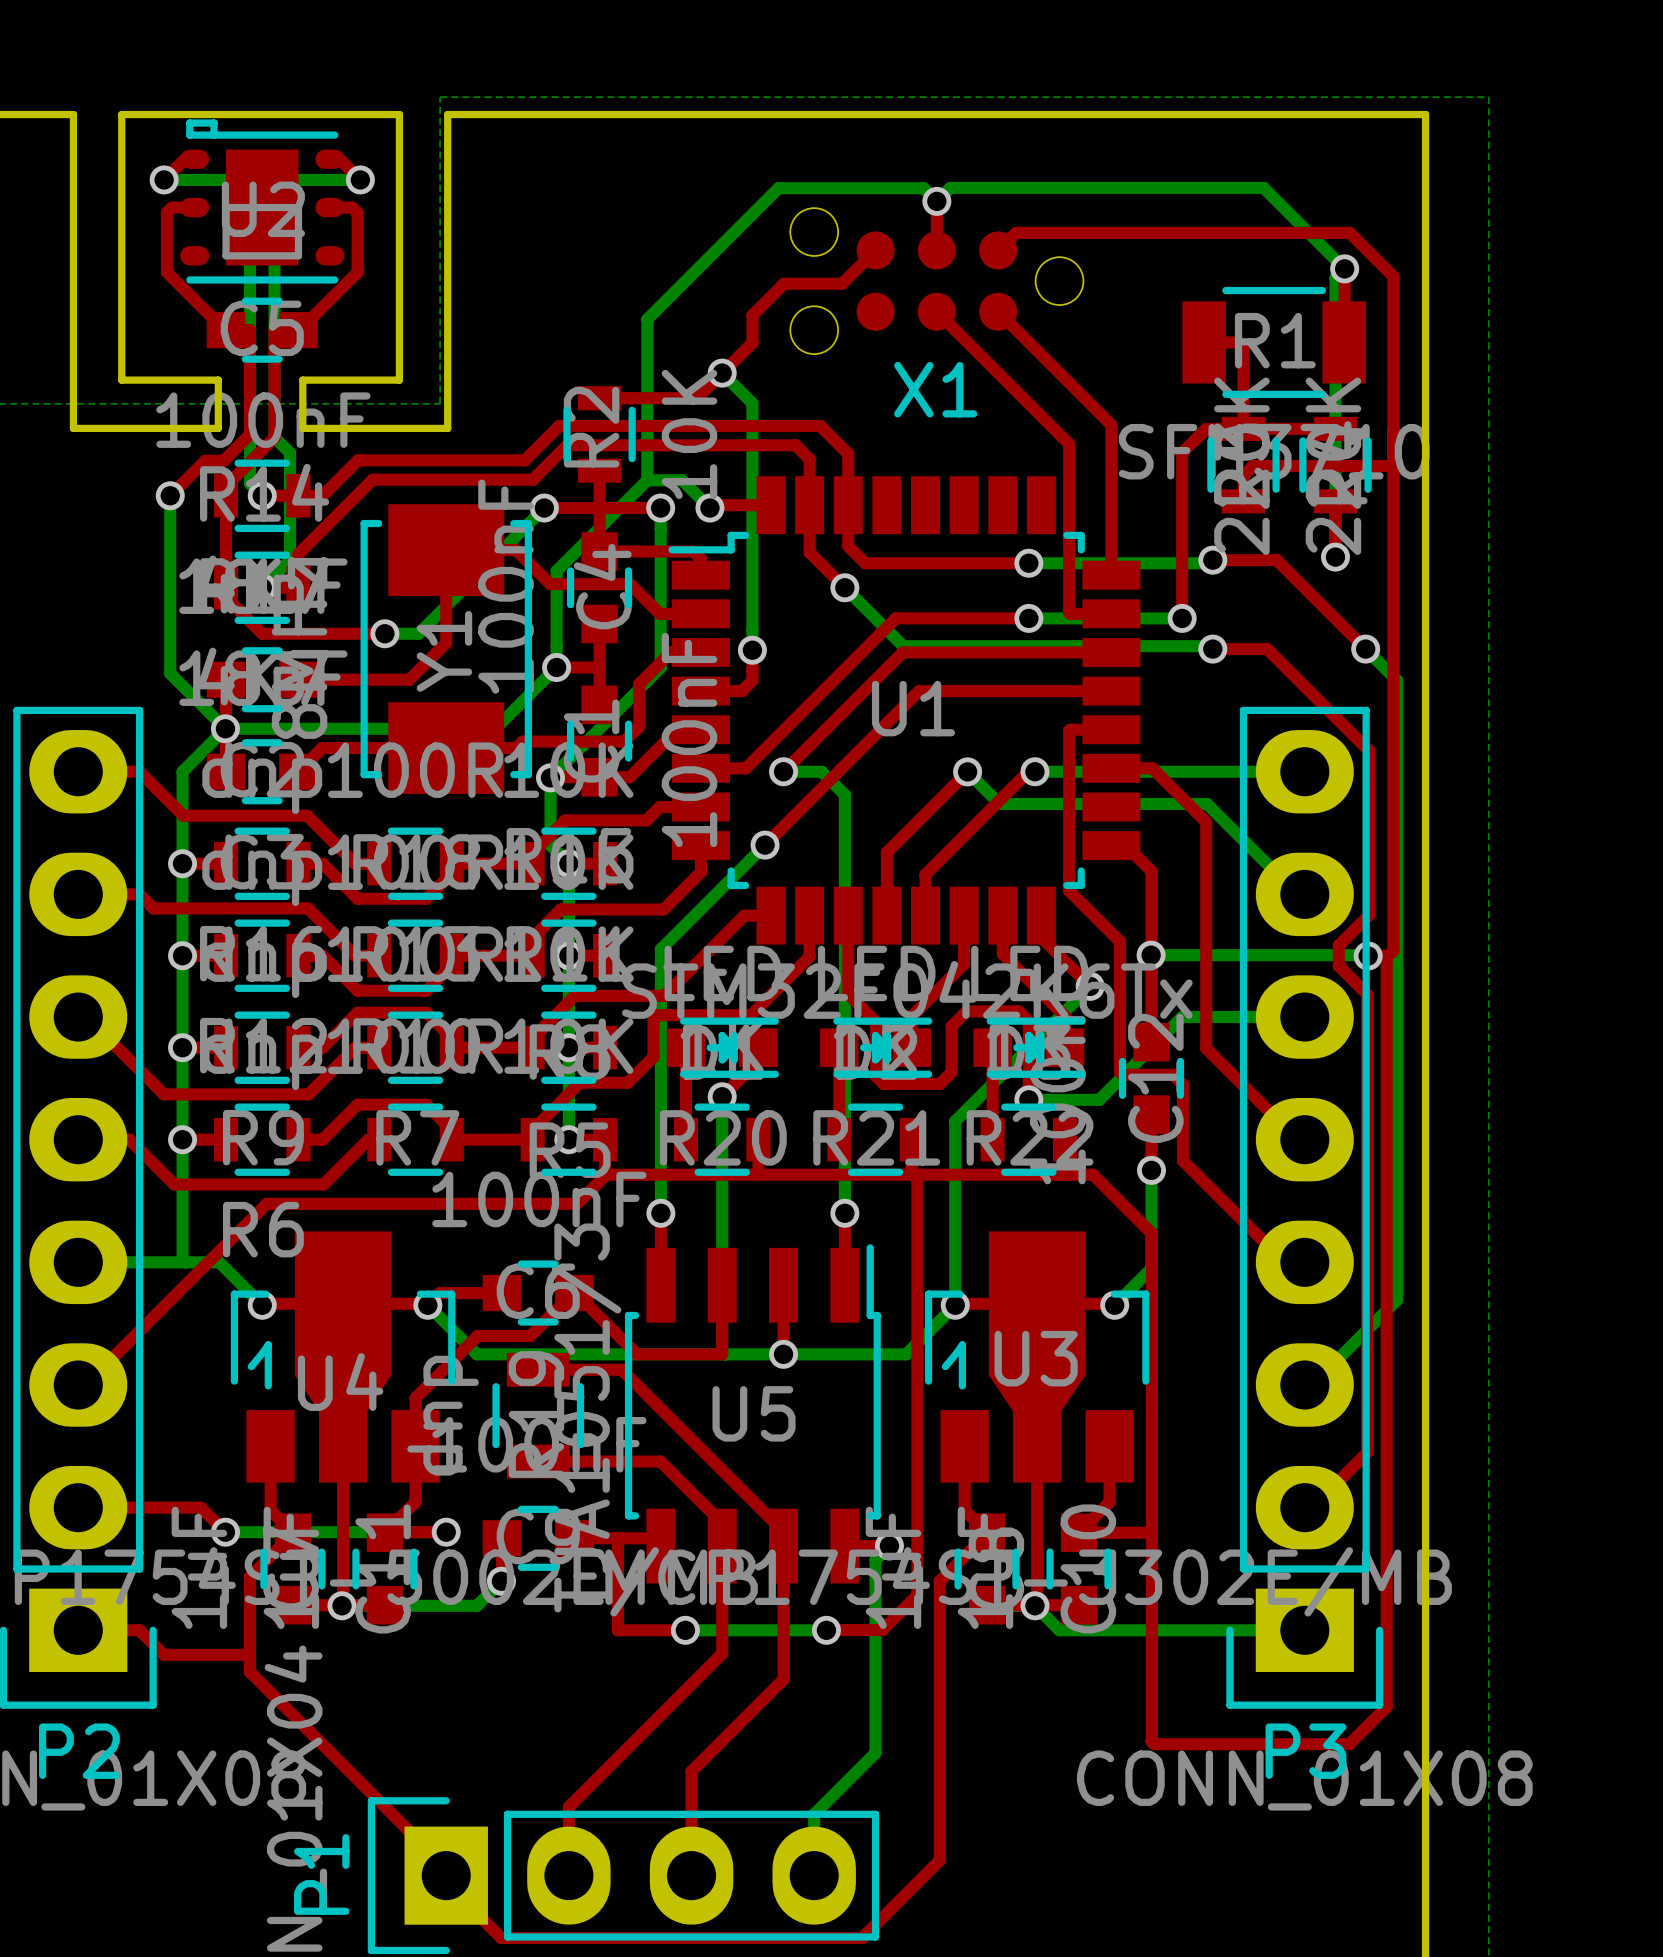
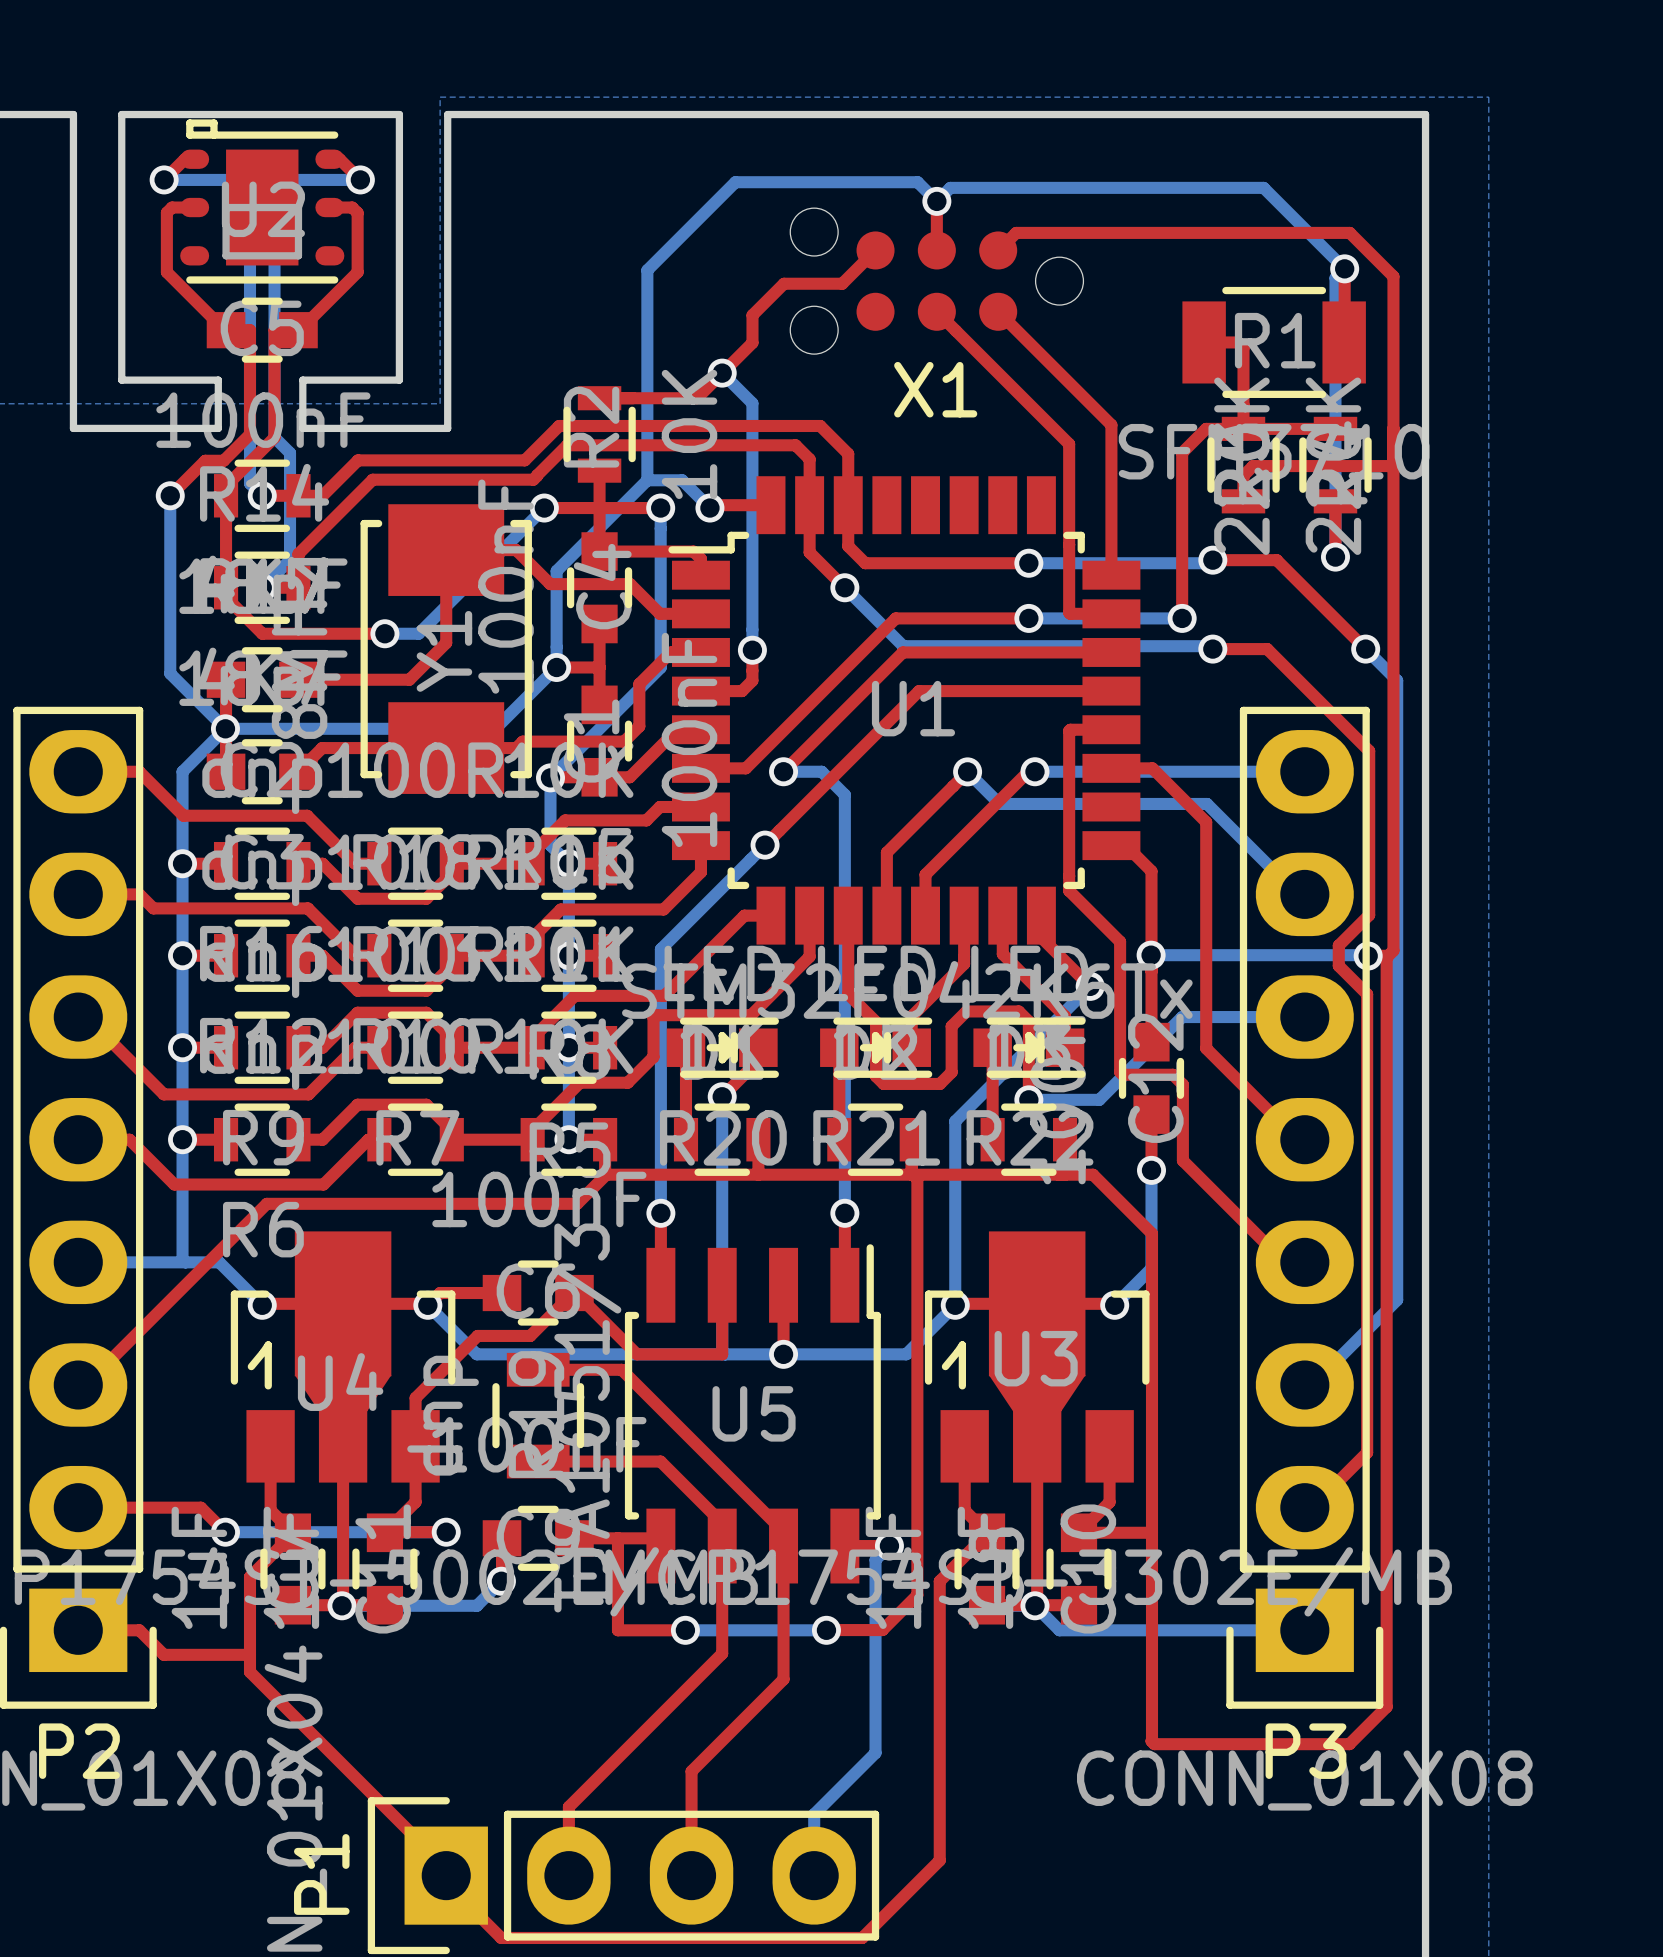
bottom track: (923, 188) (778, 188) (647, 319) -> (923, 188) (917, 182) (735, 182) (647, 270) (647, 319)

